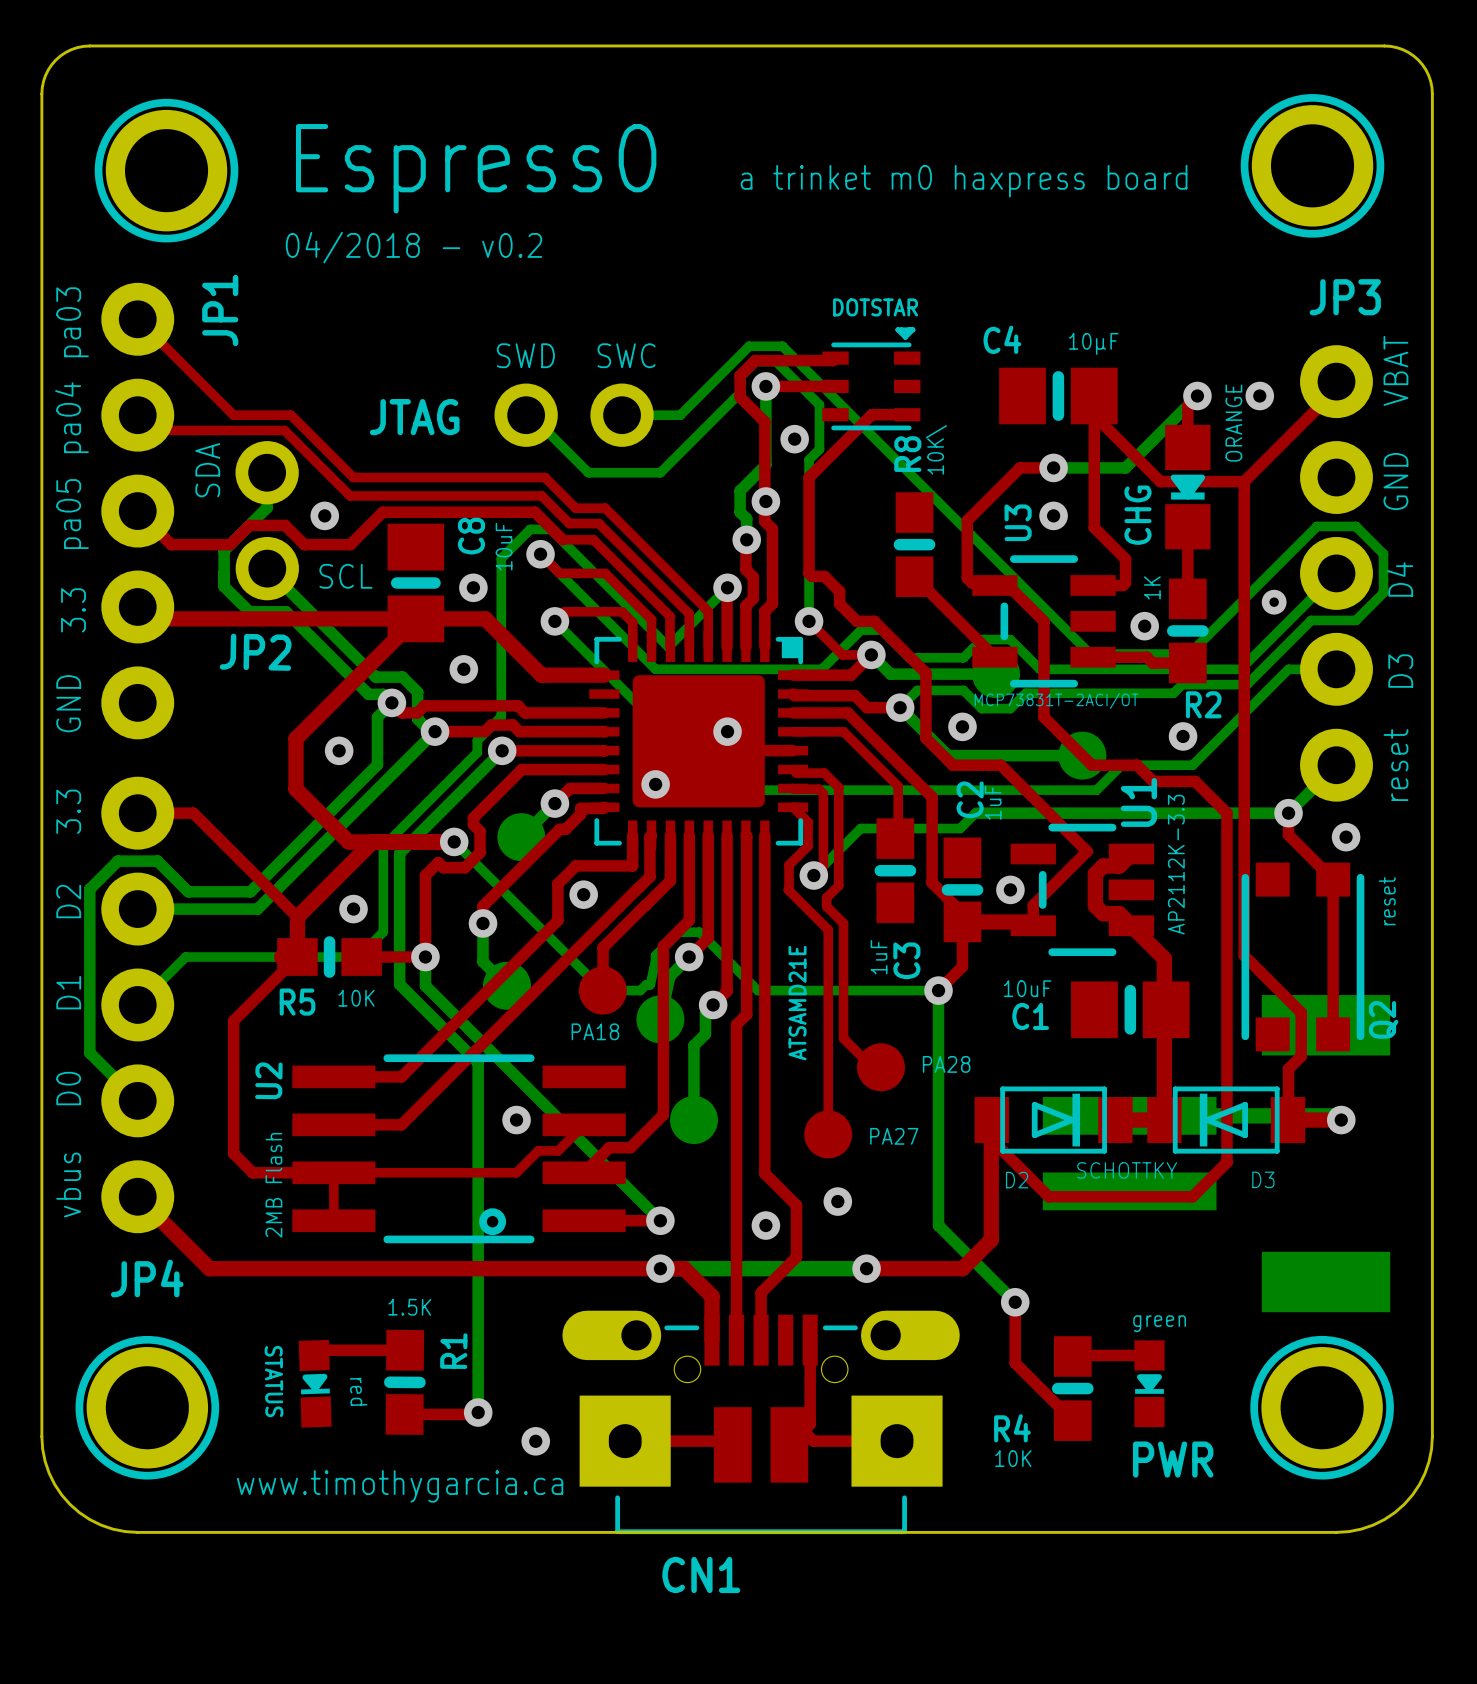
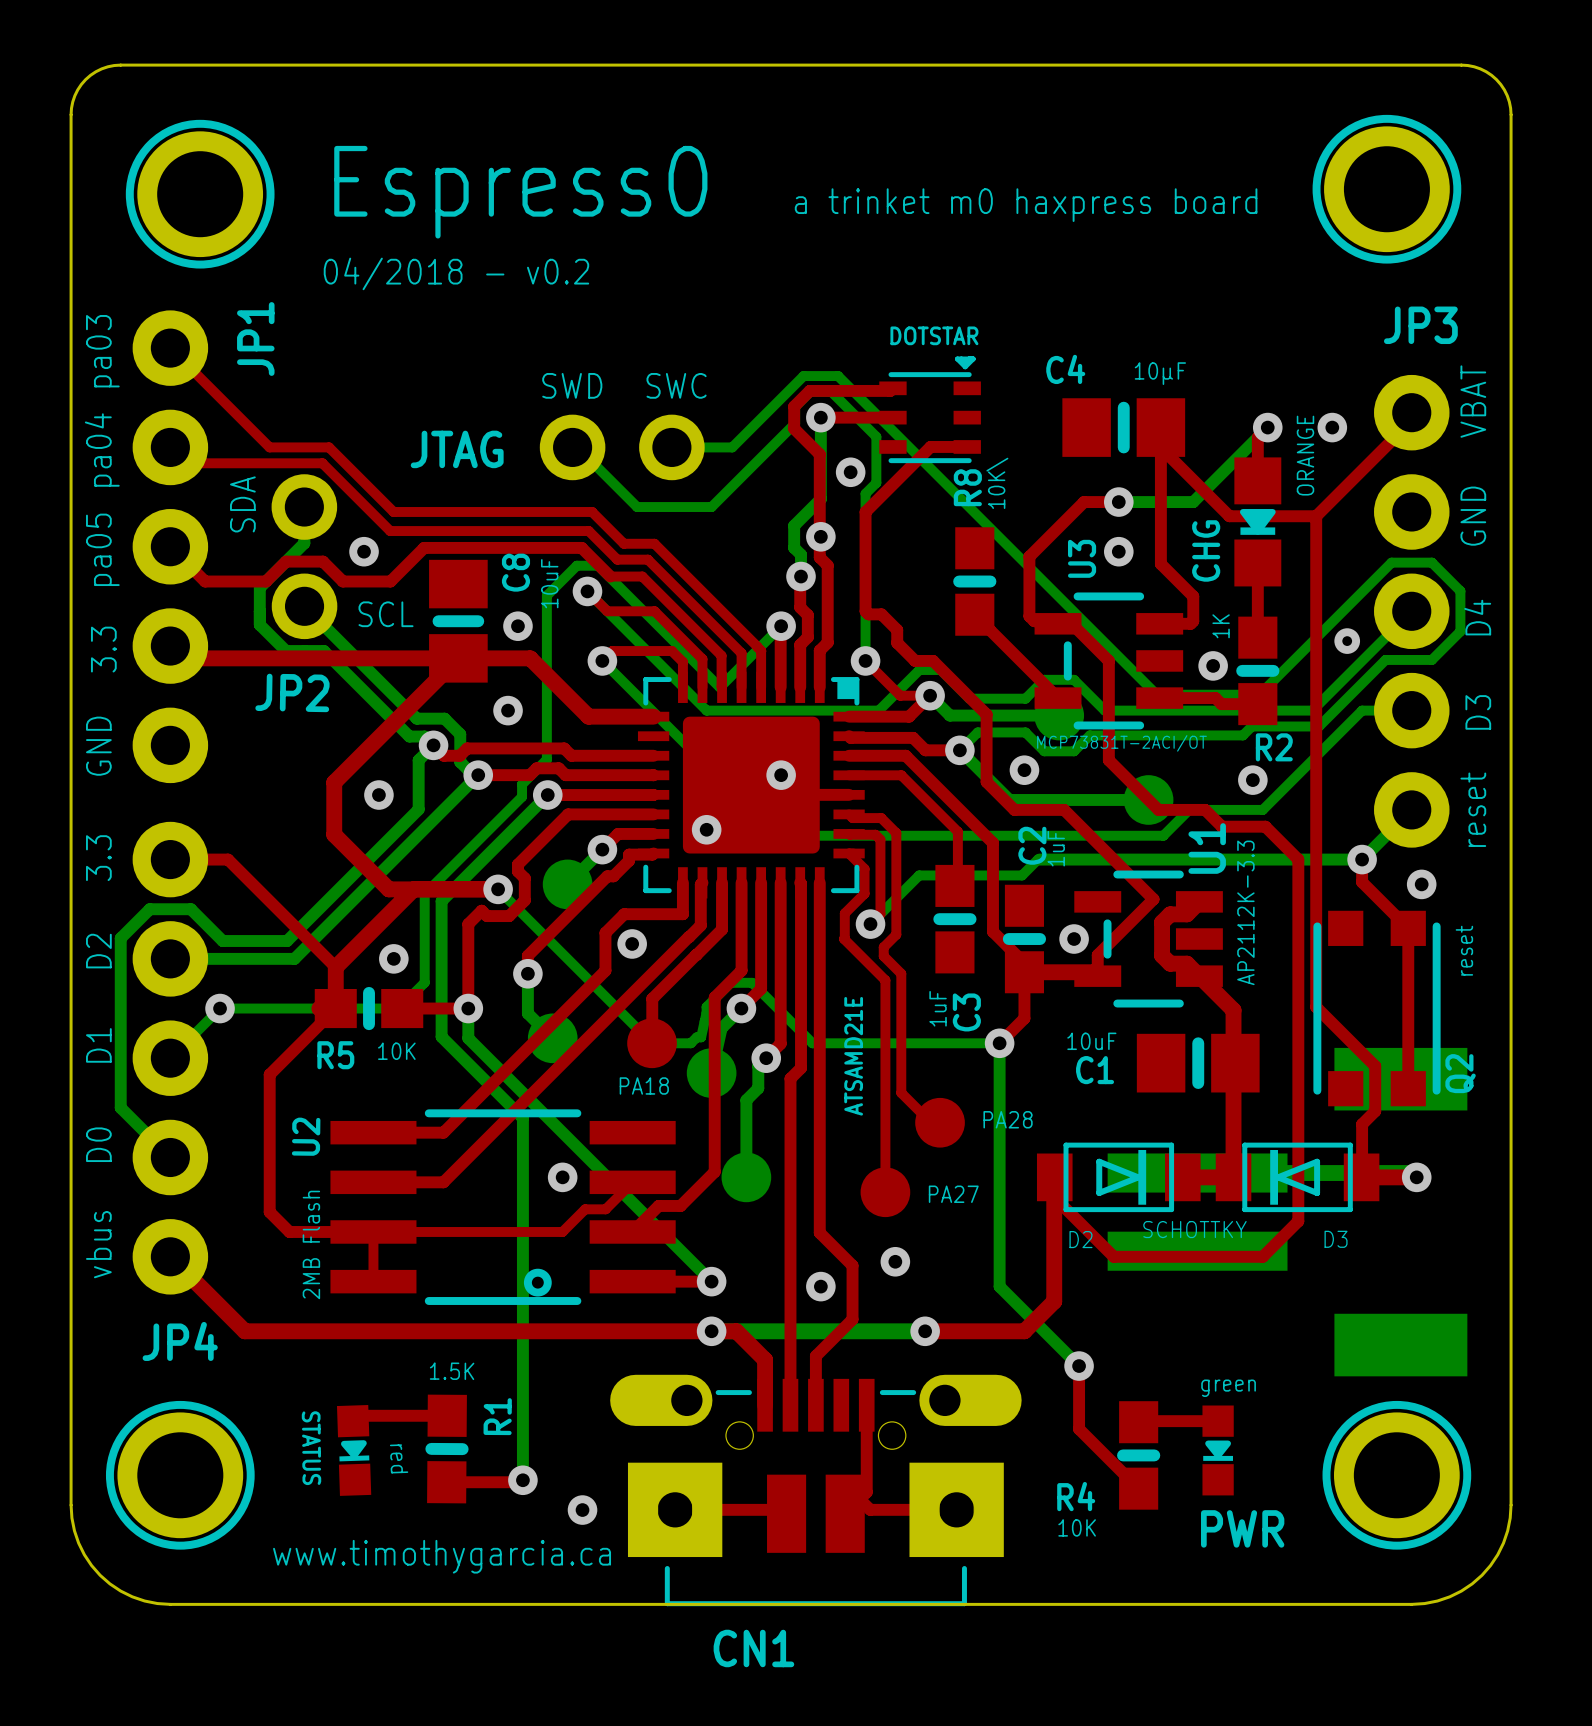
via: none -> (220, 1008)

